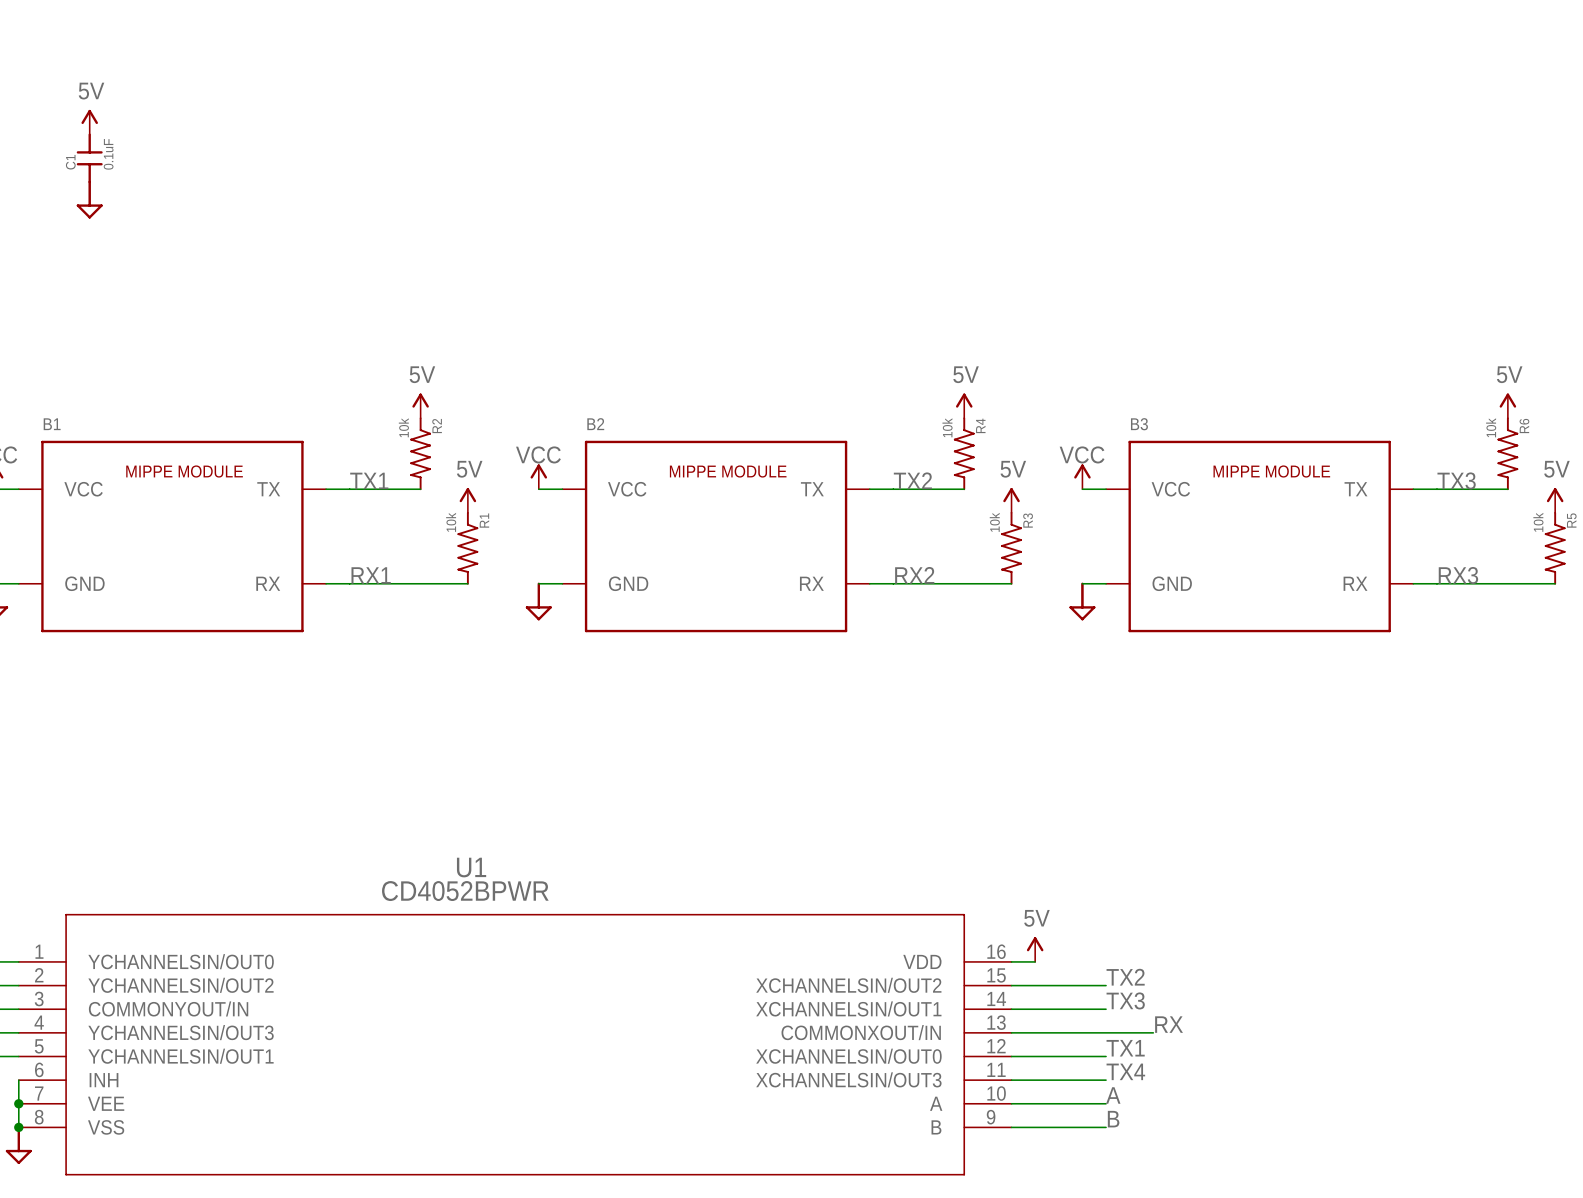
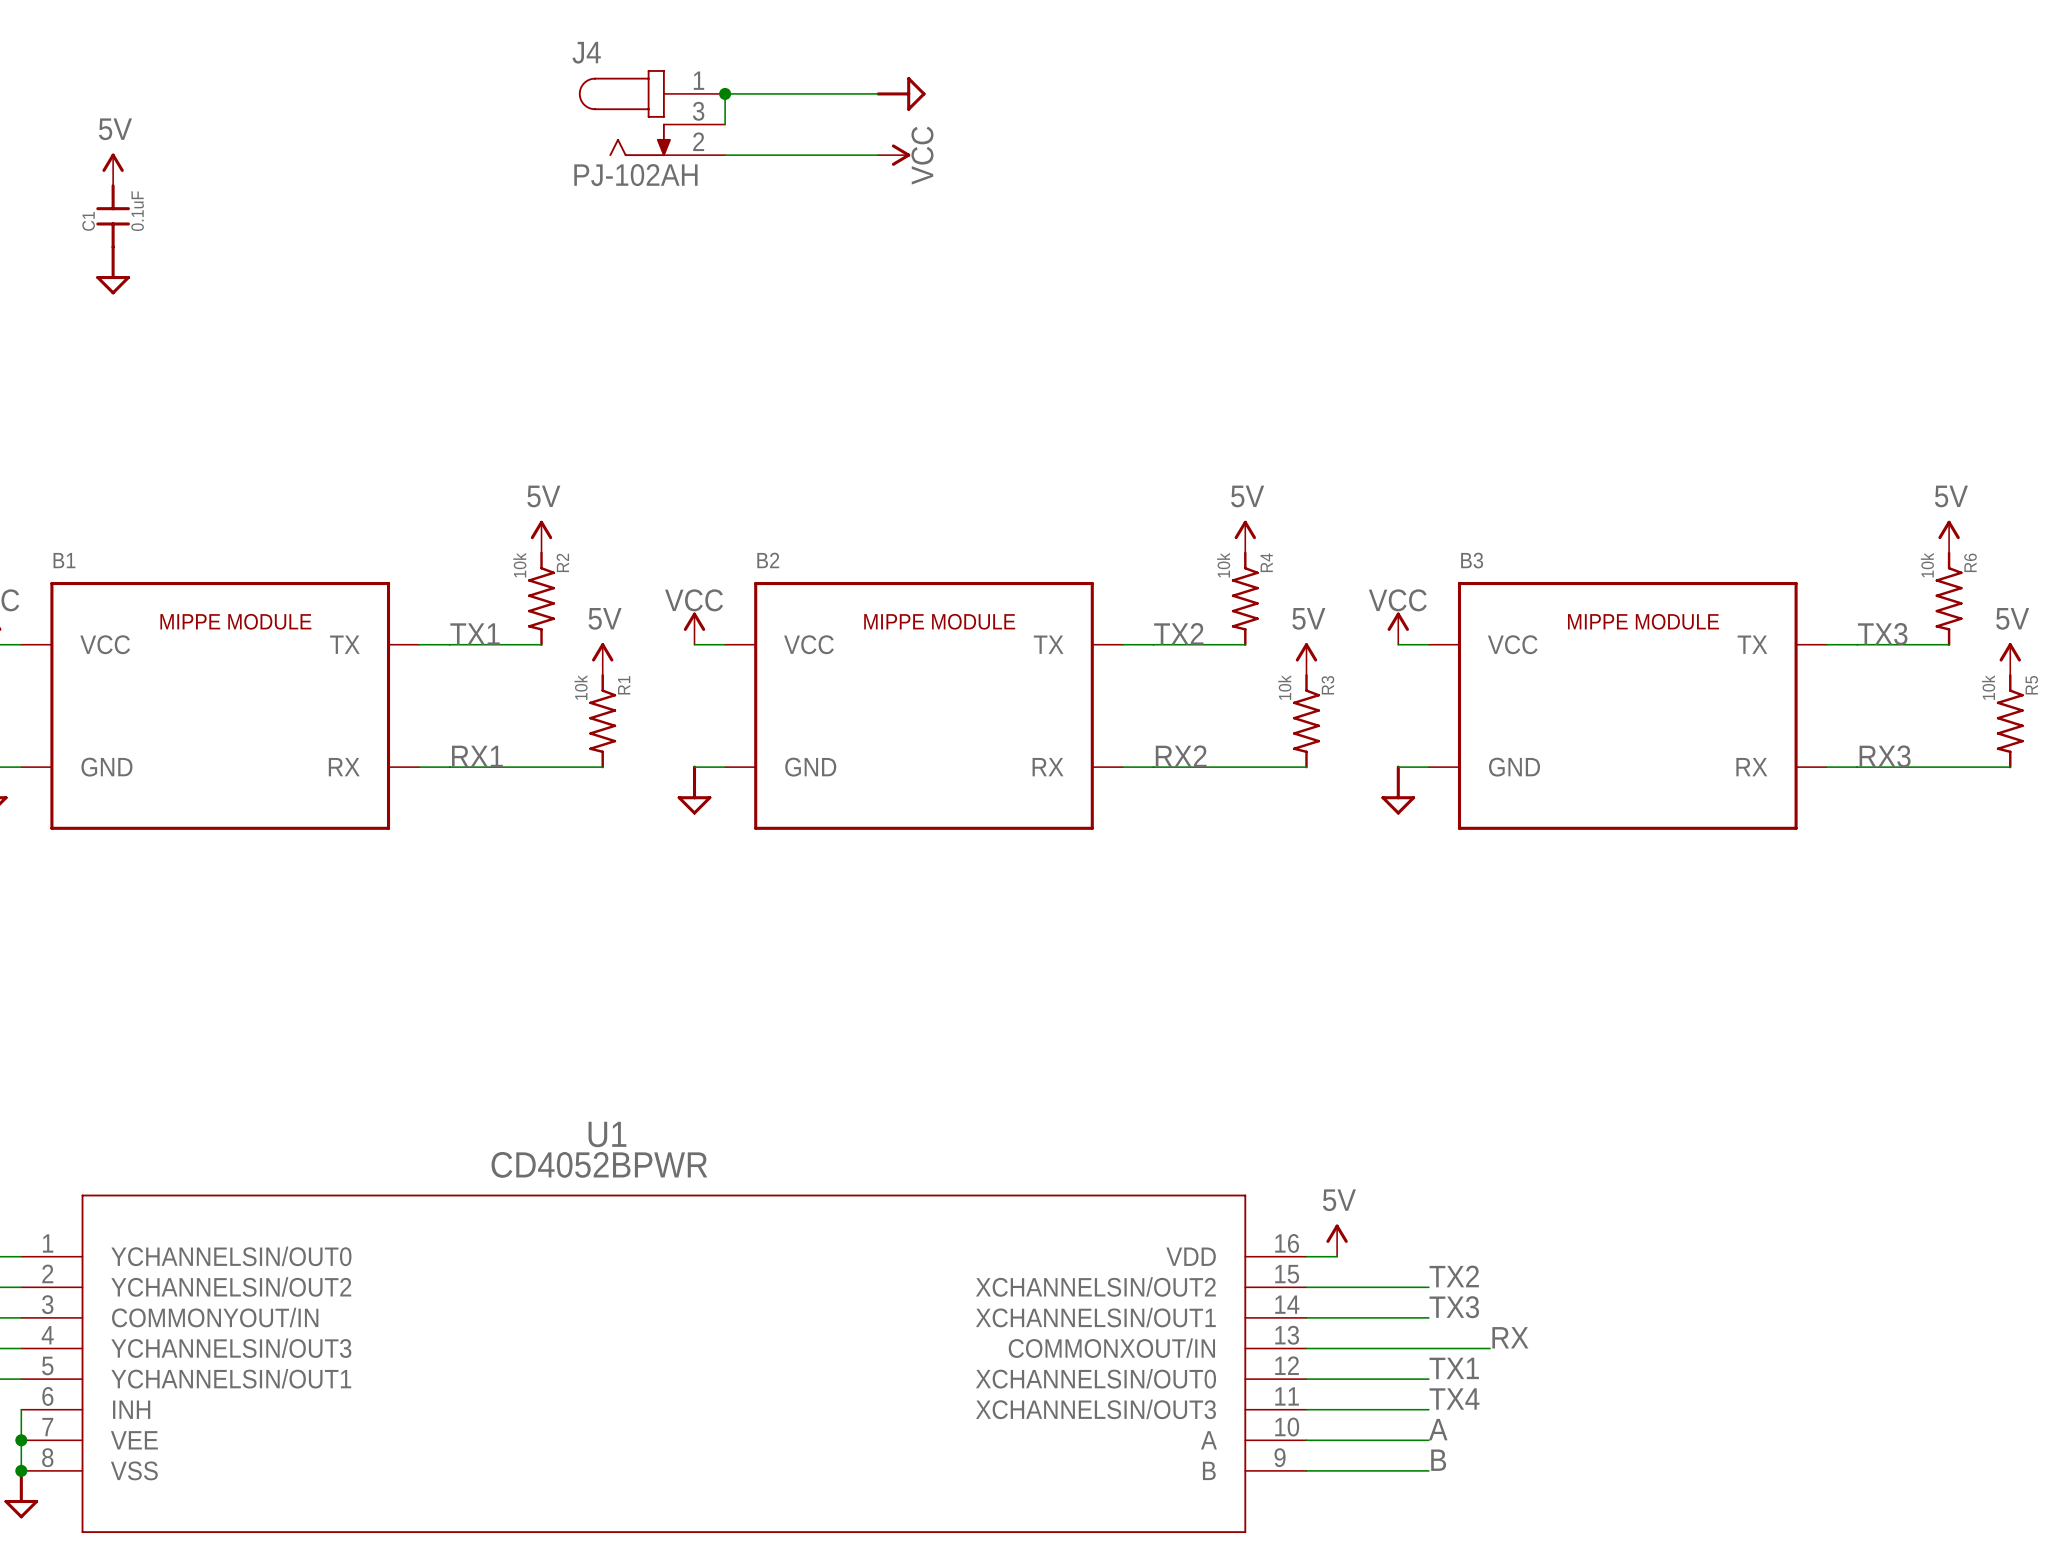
junction: none -> (725, 93)
wire: none -> (878, 93) (725, 93) (725, 124)
power symbol: none -> (901, 93)
J4: none -> PJ-102AH (651, 113)
wire: none -> (725, 155) (878, 155)
power symbol: none -> VCC (894, 155)

